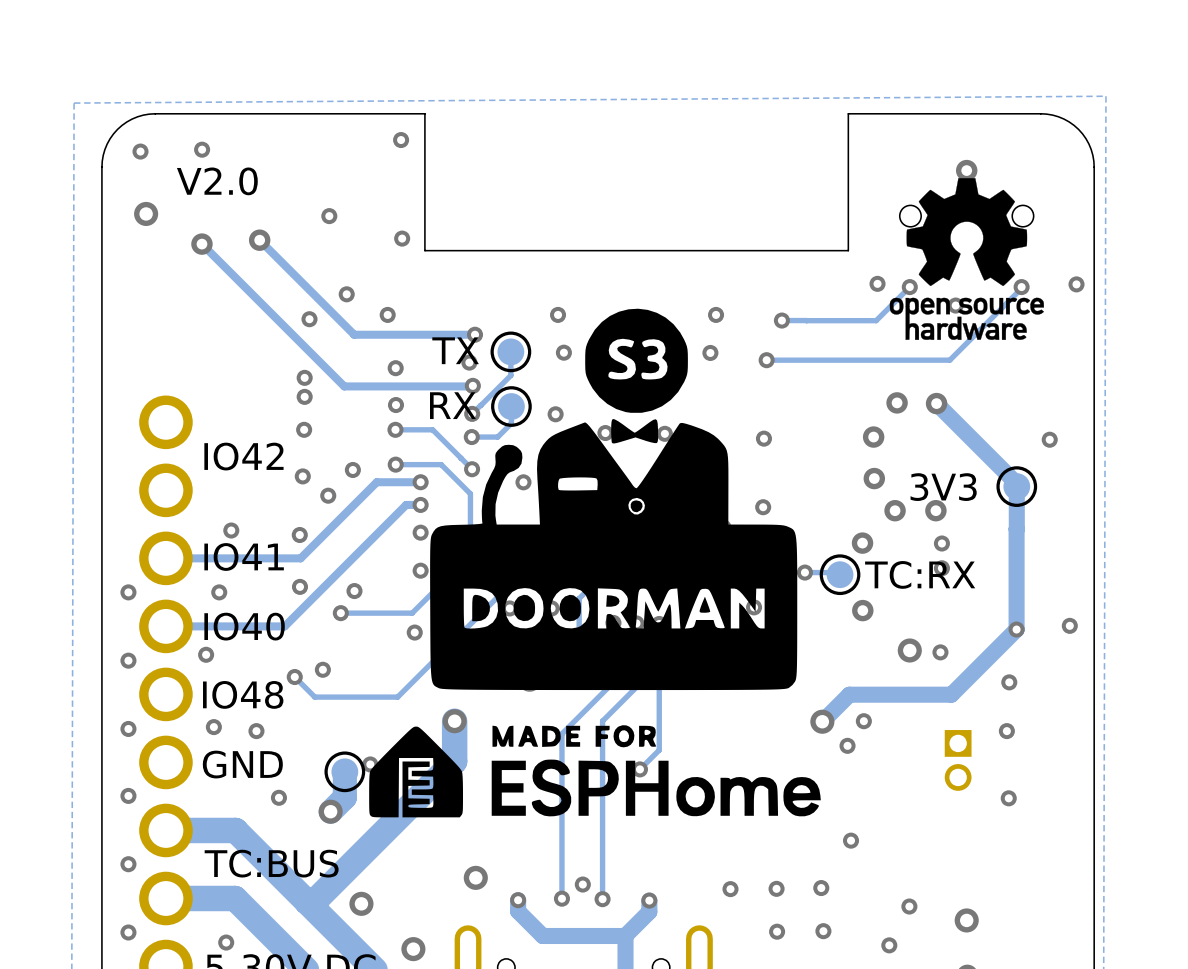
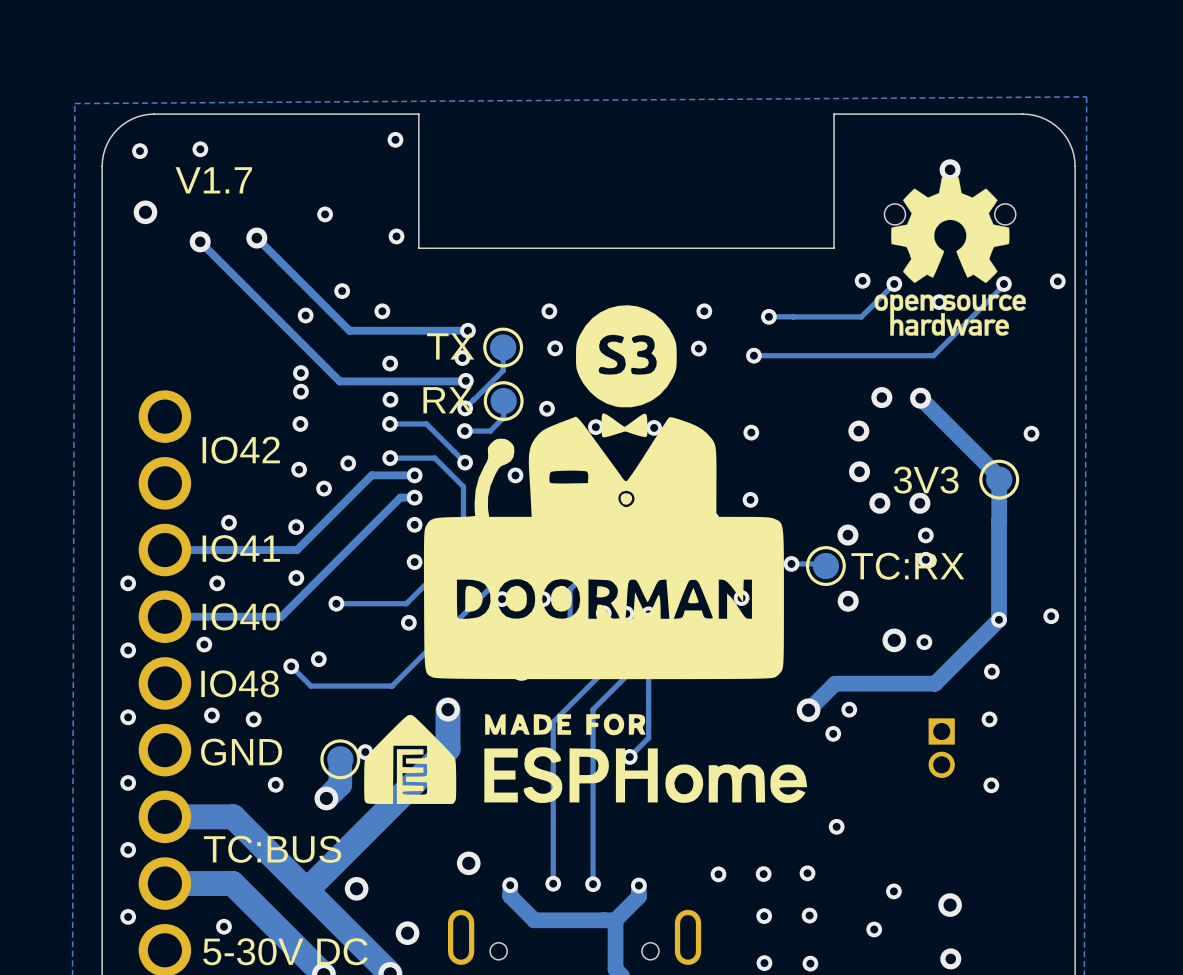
text: V2.0 (217, 181) -> V1.7 (213, 180)
via: (354, 591) -> none
via: (582, 884) -> none

